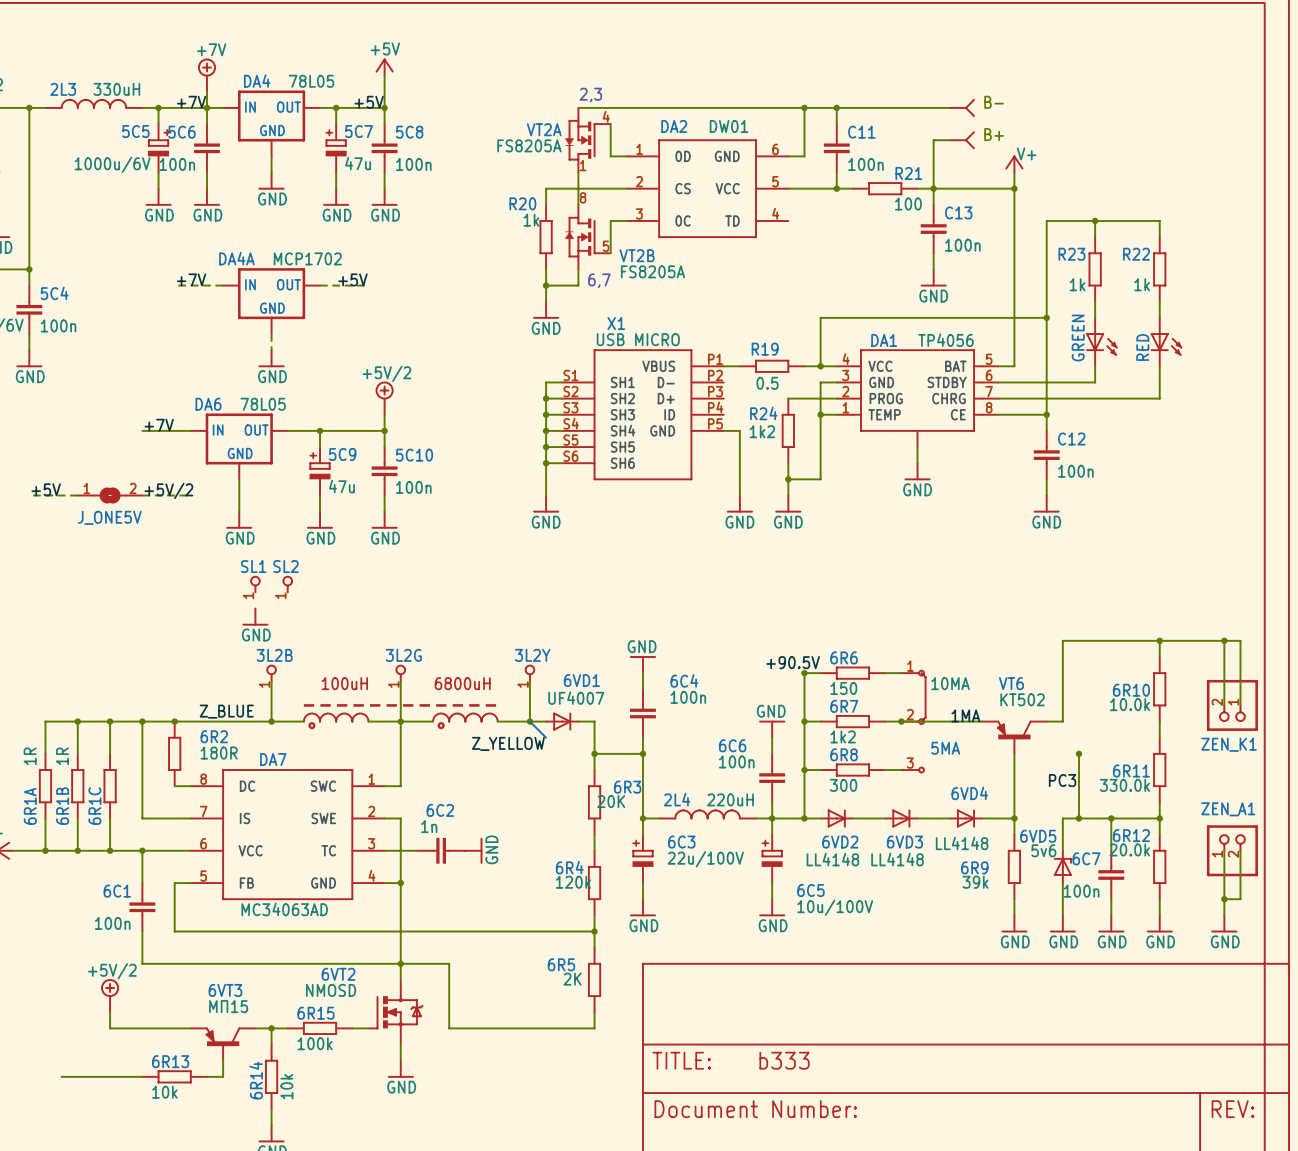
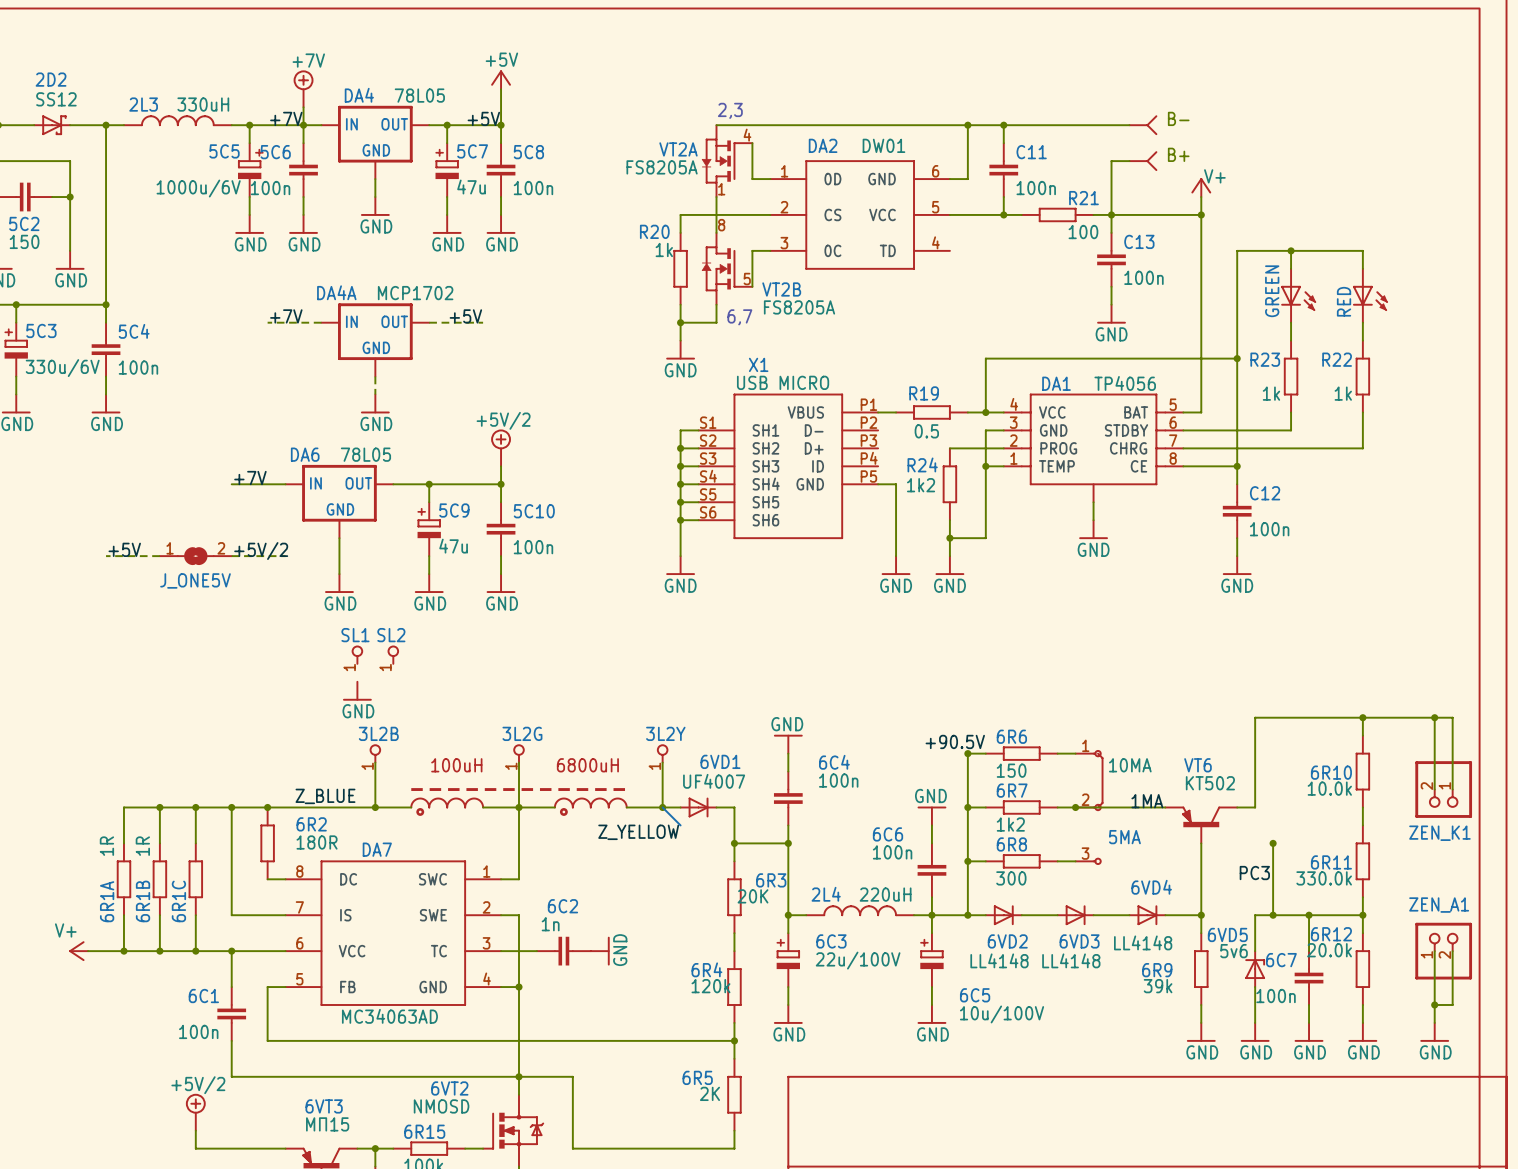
R23 position: (1095, 269) -> (1291, 376)
R22 position: (1159, 269) -> (1362, 376)
GREEN position: (1101, 342) -> (1298, 295)
RED position: (1166, 342) -> (1370, 295)

